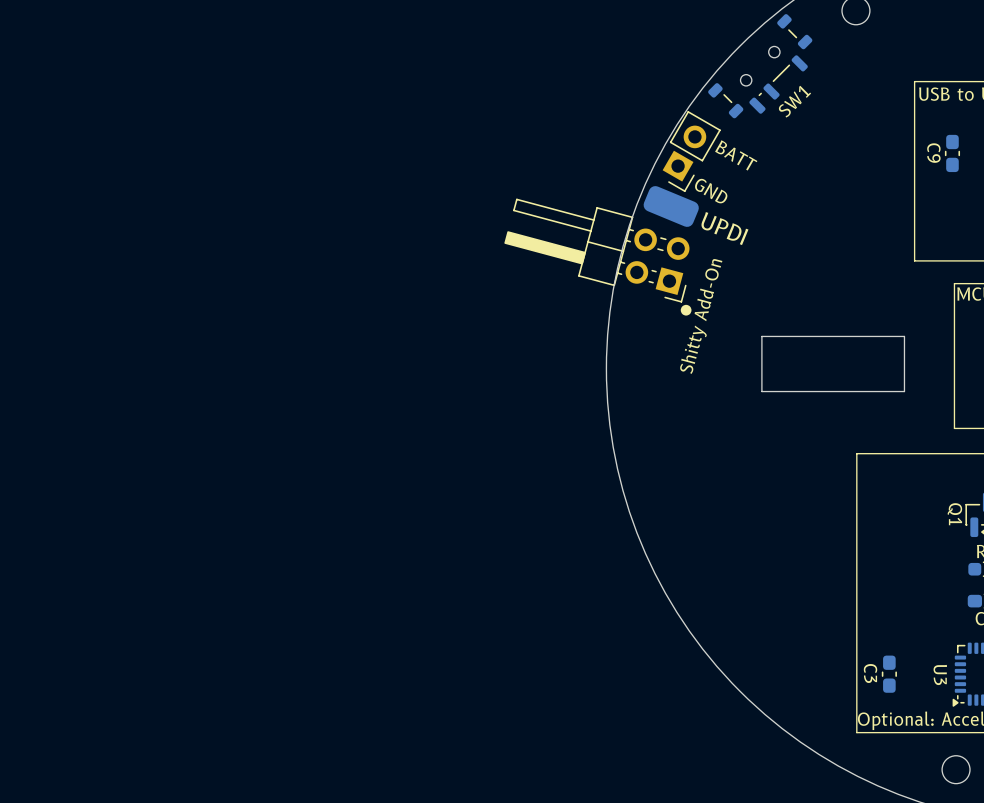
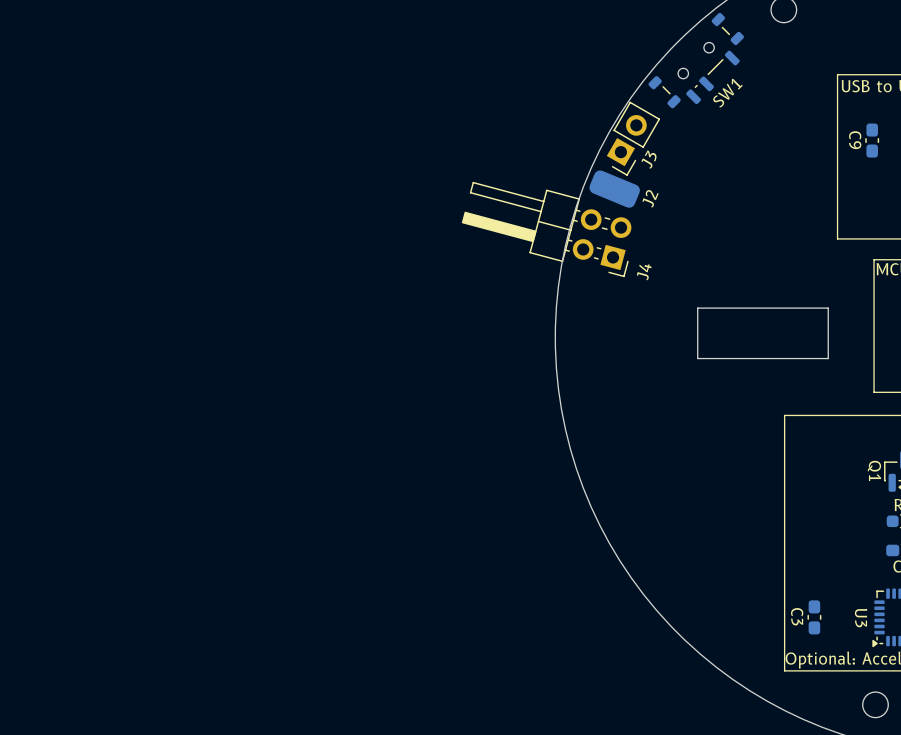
text: BATT (736, 155) -> none
J3 name: none -> J3 (648, 159)
text: GND (711, 191) -> none
J2 name: none -> J2 (650, 198)
J2 text: UPDI (724, 228) -> none
J4 name: none -> J4 (644, 272)
drawing: [680, 304, 692, 316] -> none
J4 value: Shitty Add-On (701, 316) -> none

